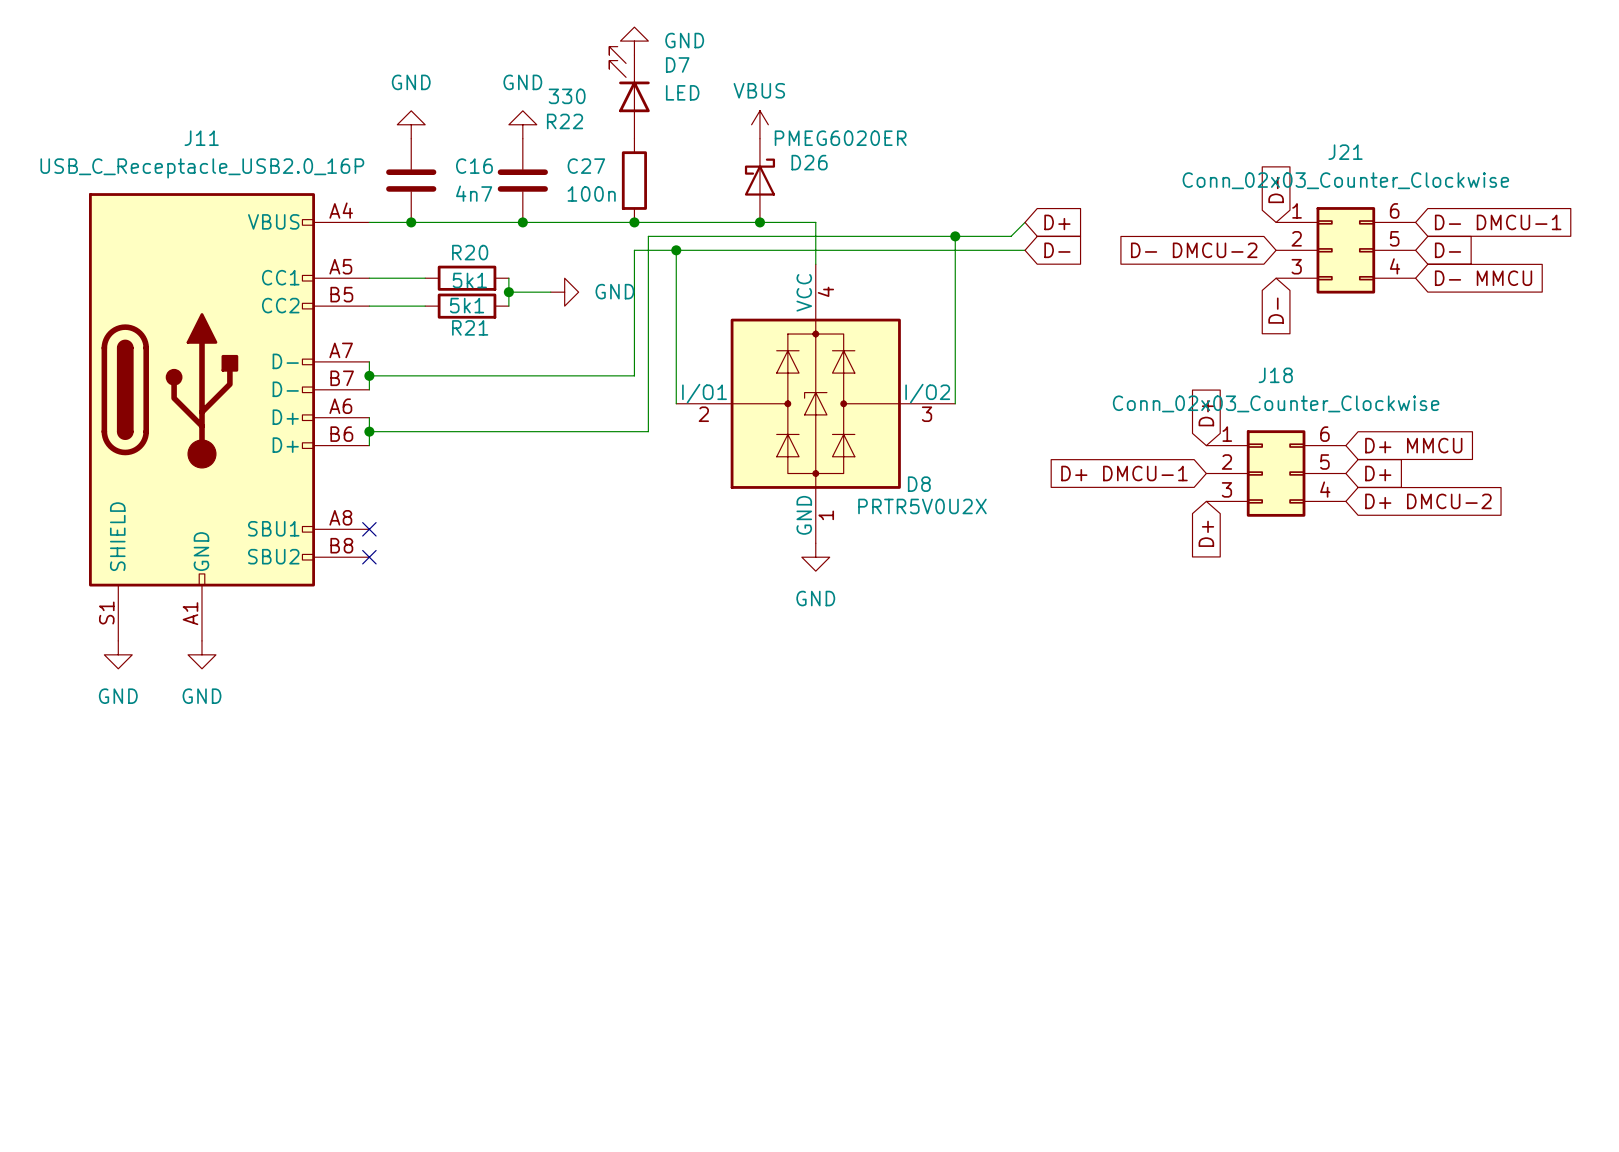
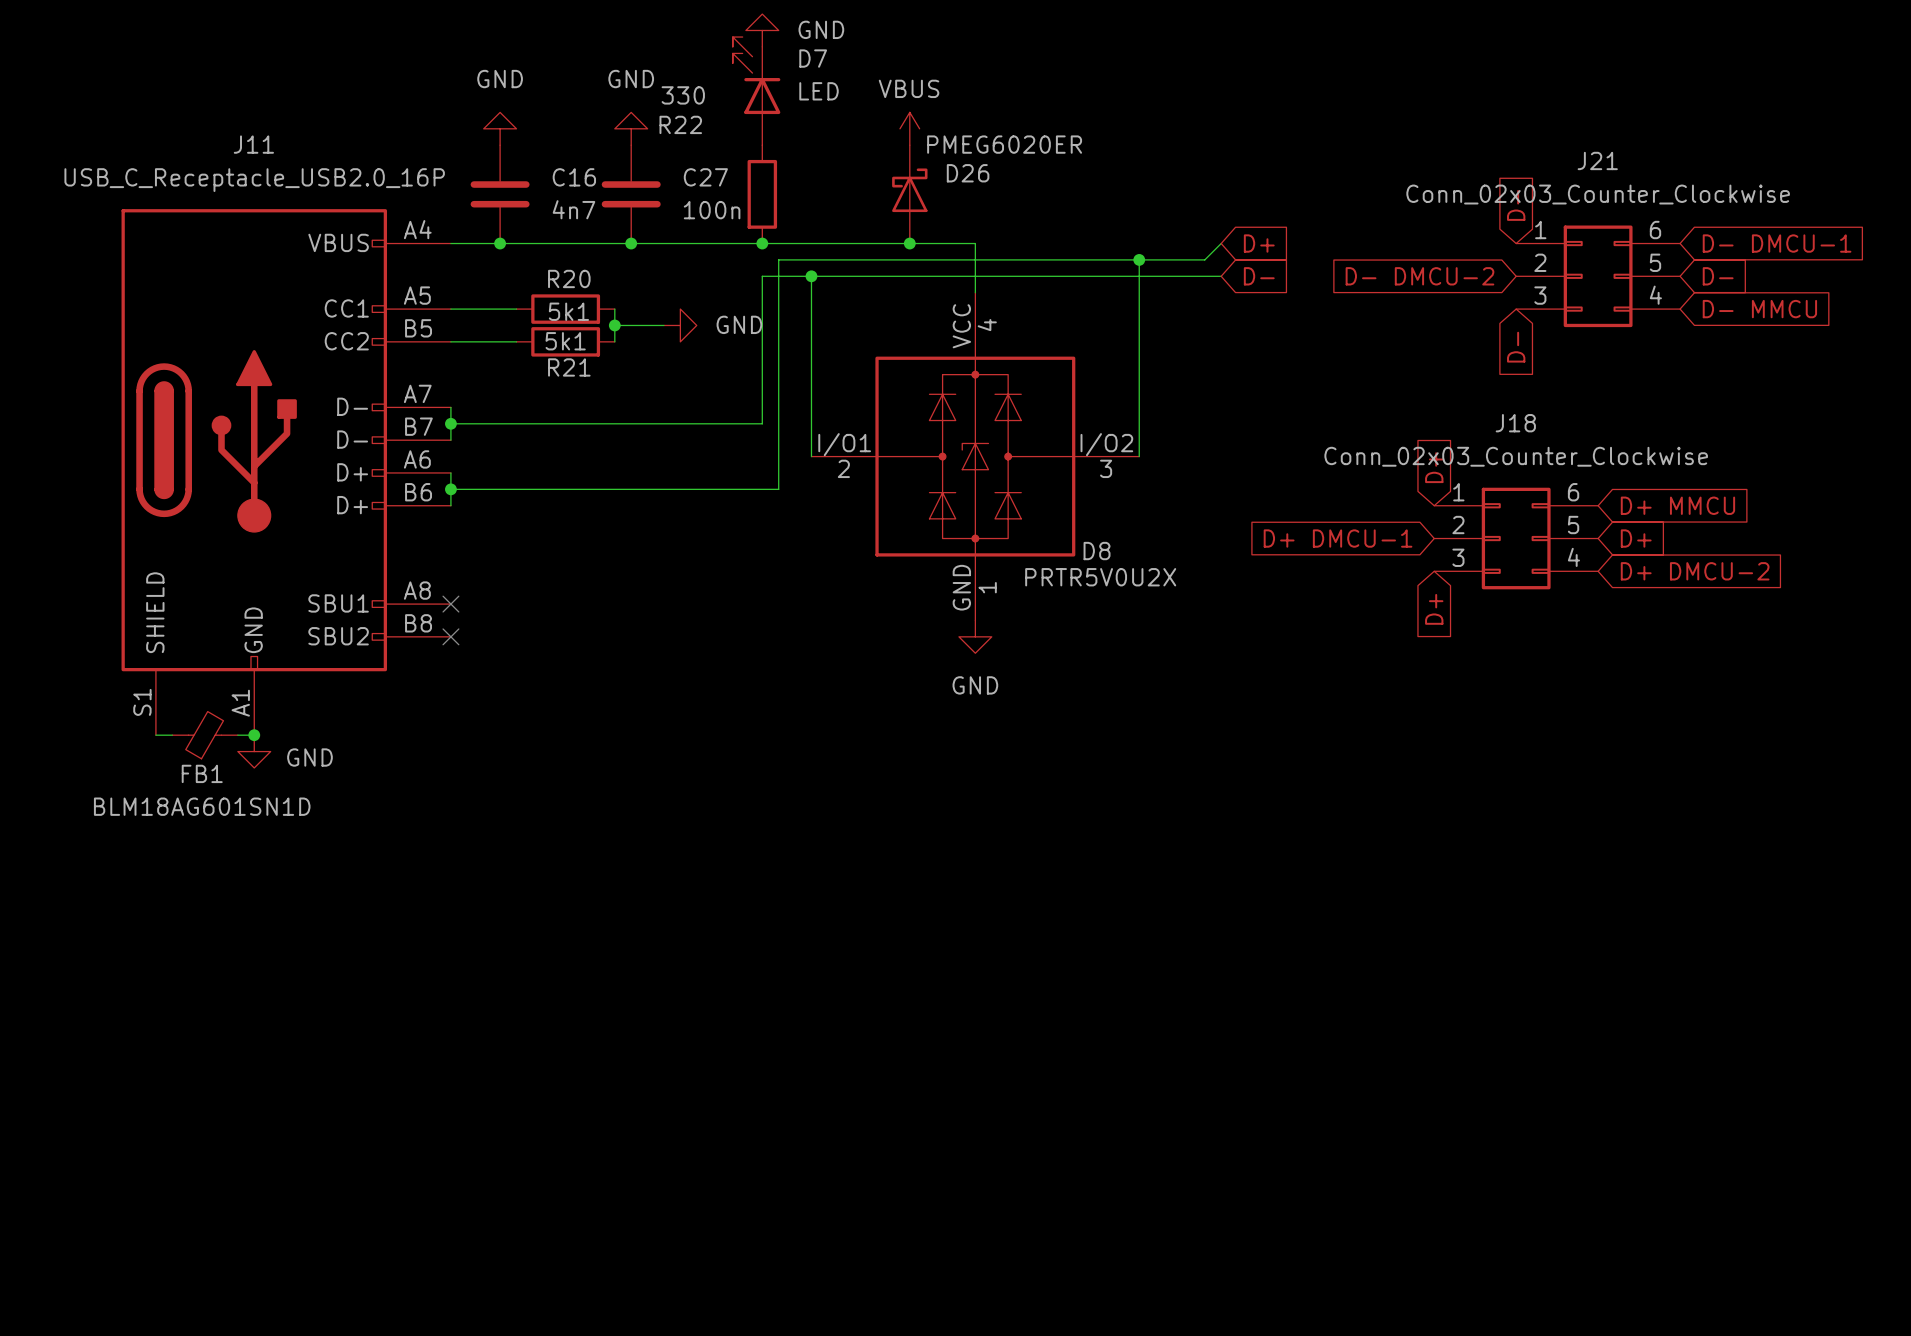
wire: none -> (155, 735) (172, 735)
FB1: none -> BLM18AG601SN1D (205, 735)
wire: none -> (237, 735) (254, 735)
junction: none -> (254, 735)
power symbol: GND (118, 654) -> none
power symbol text position: GND (201, 696) -> GND (309, 757)

